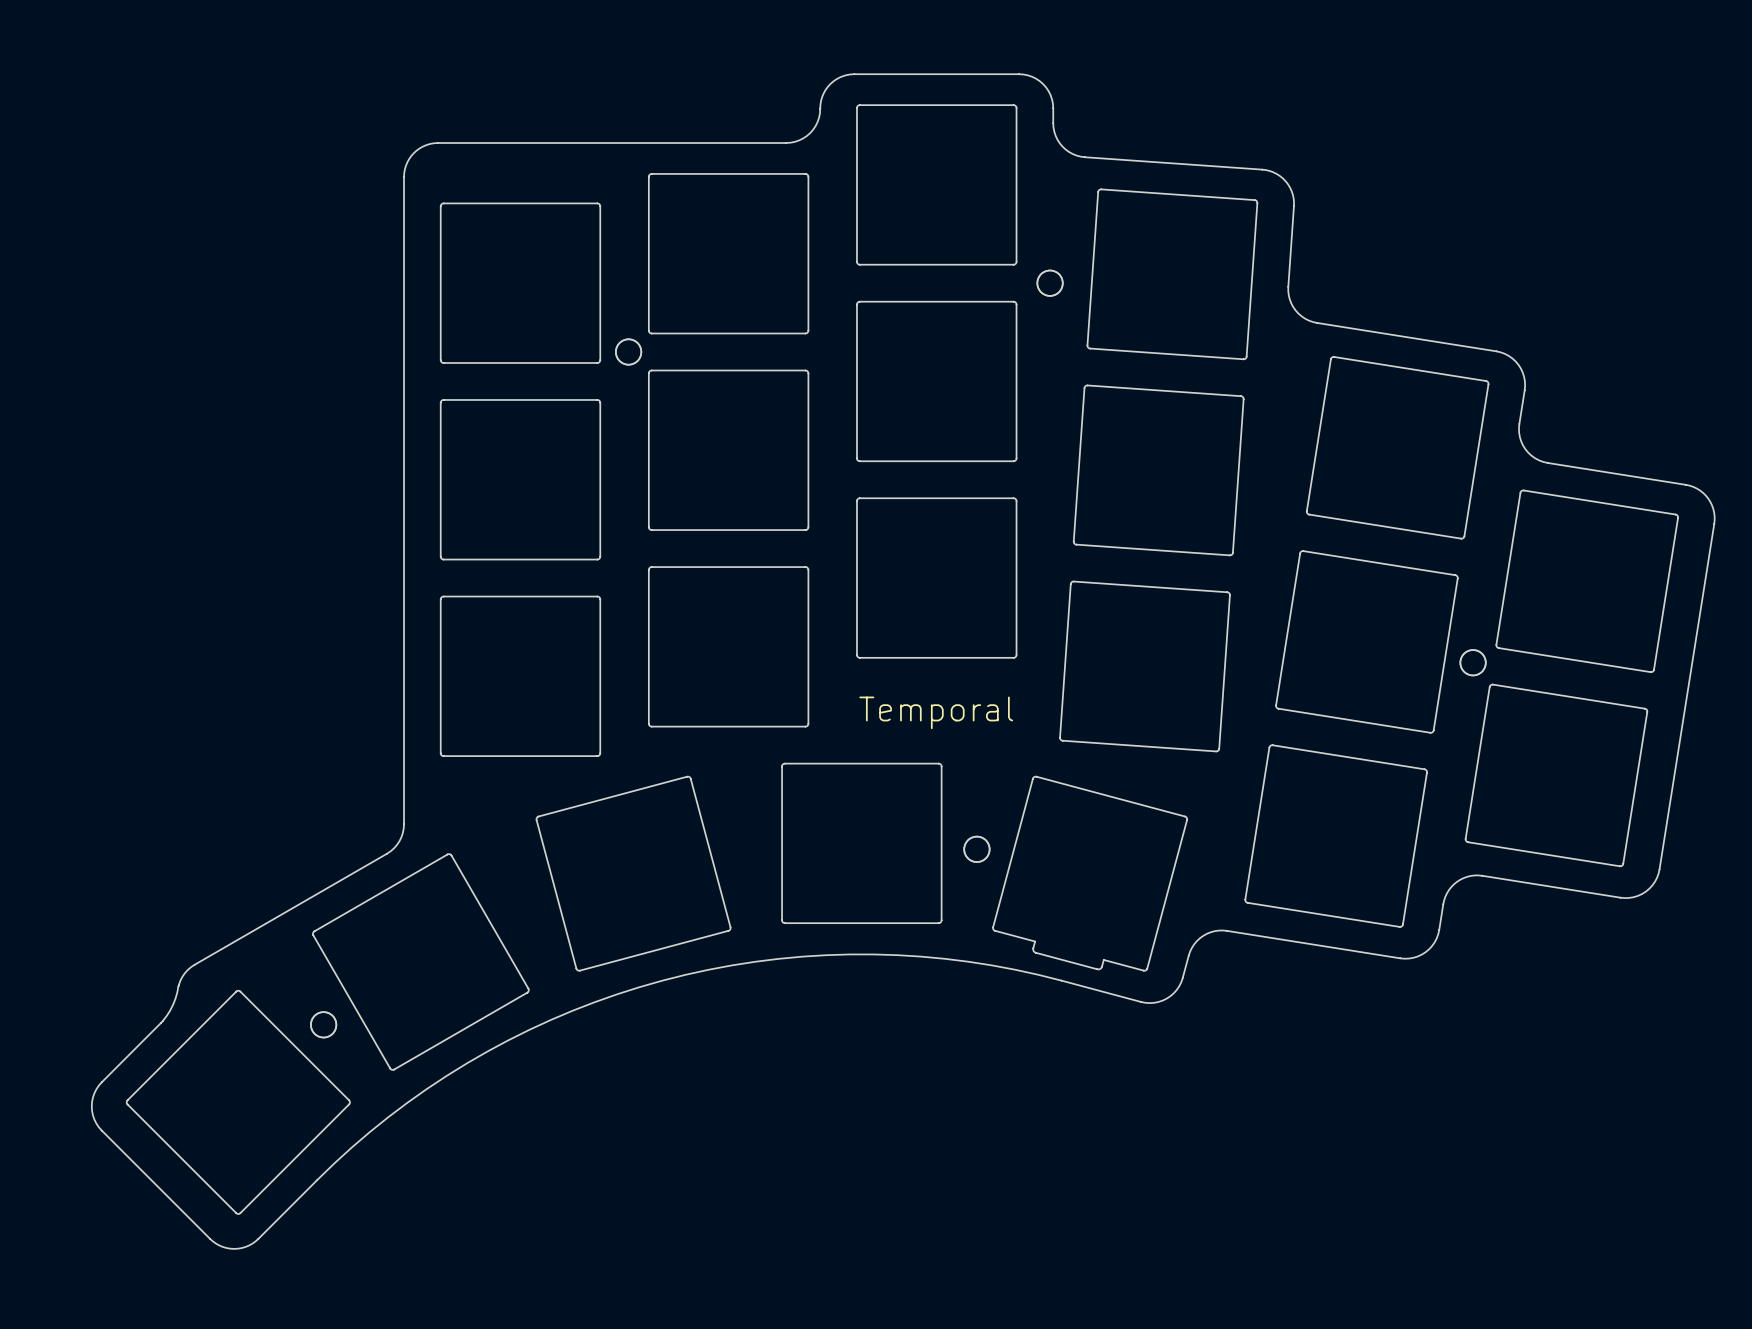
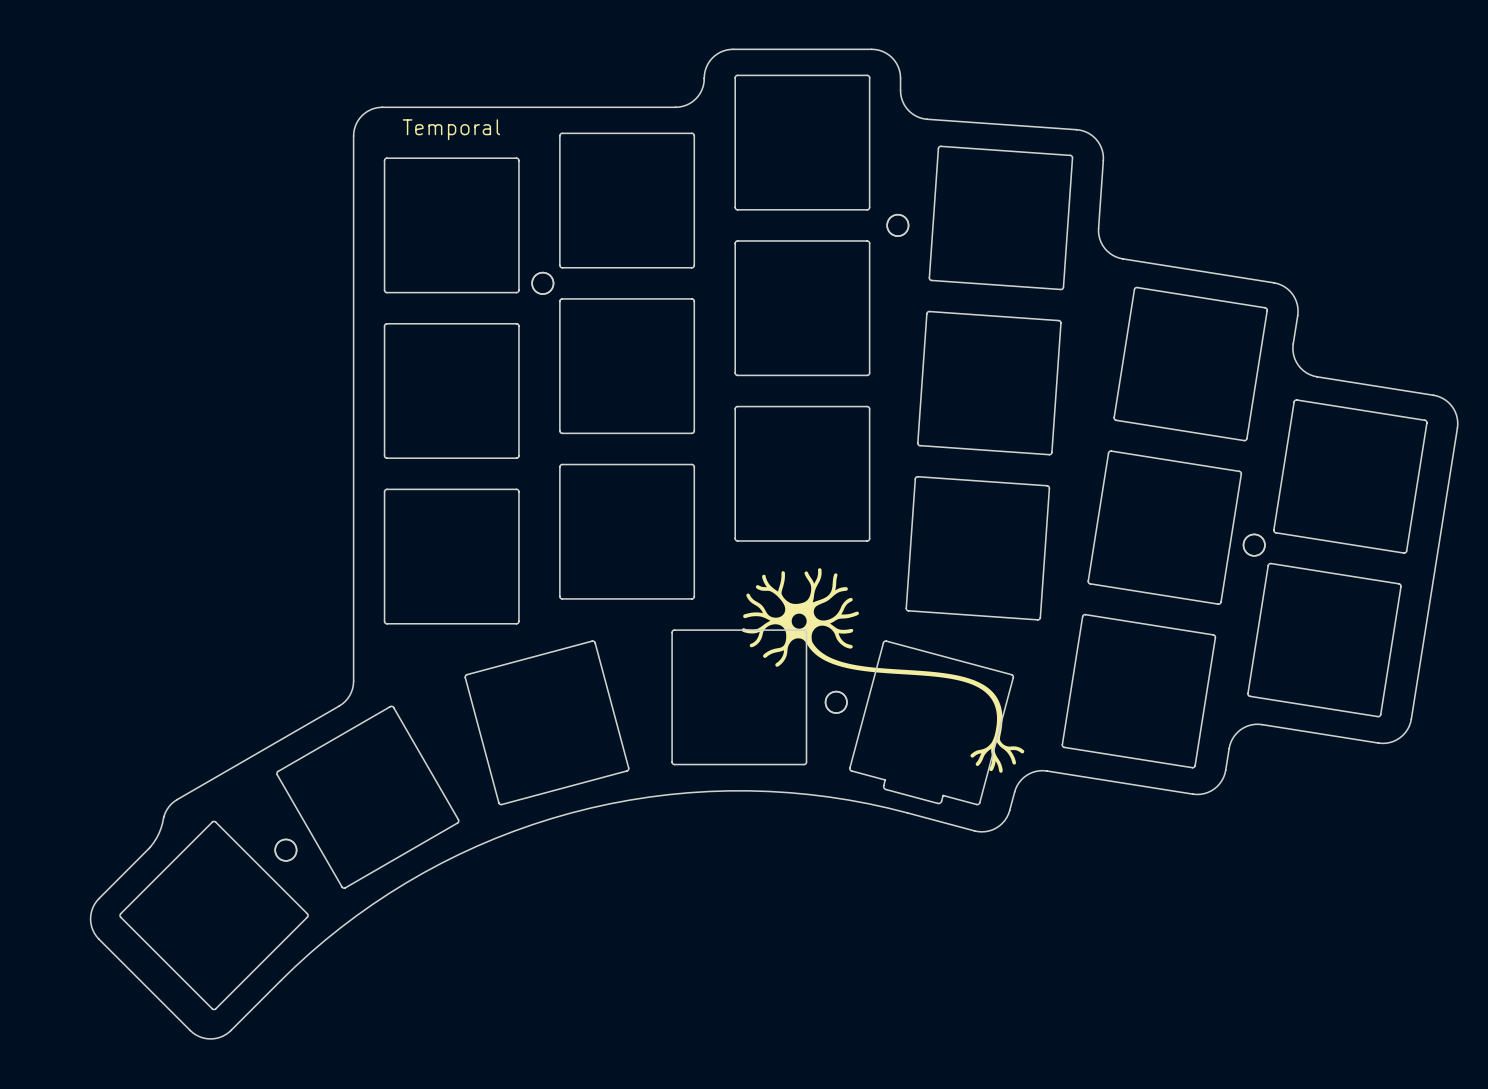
text: none -> Temporal (451, 129)
drawing: none -> [741, 568, 1025, 773]
text: Temporal (936, 712) -> none

